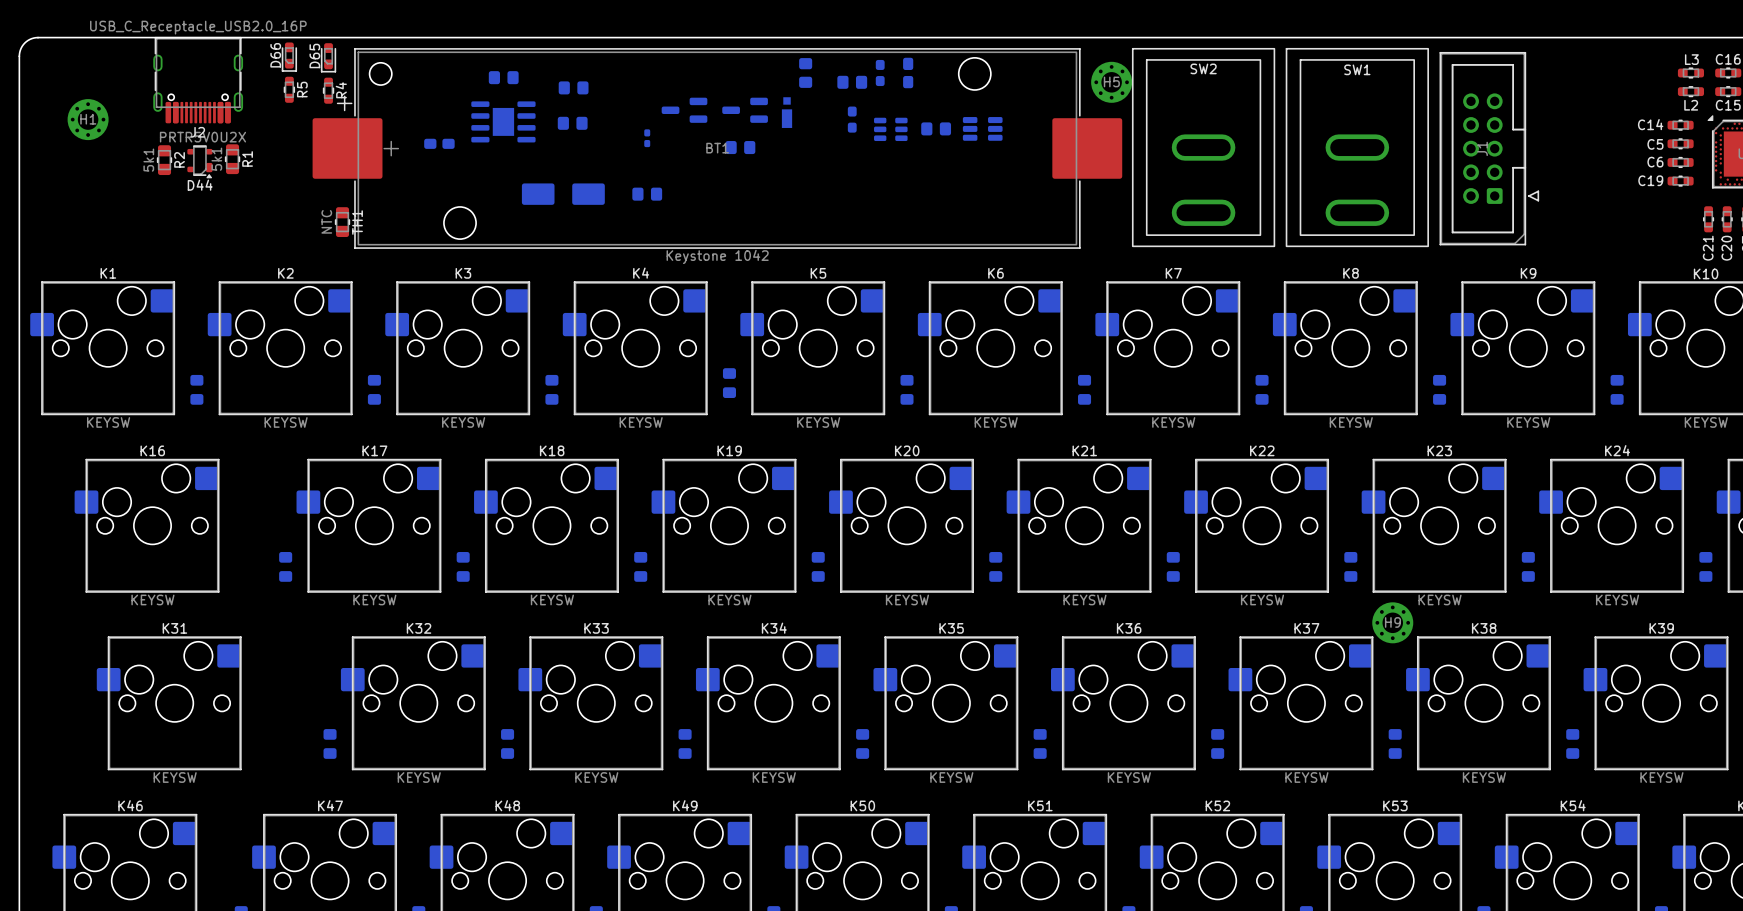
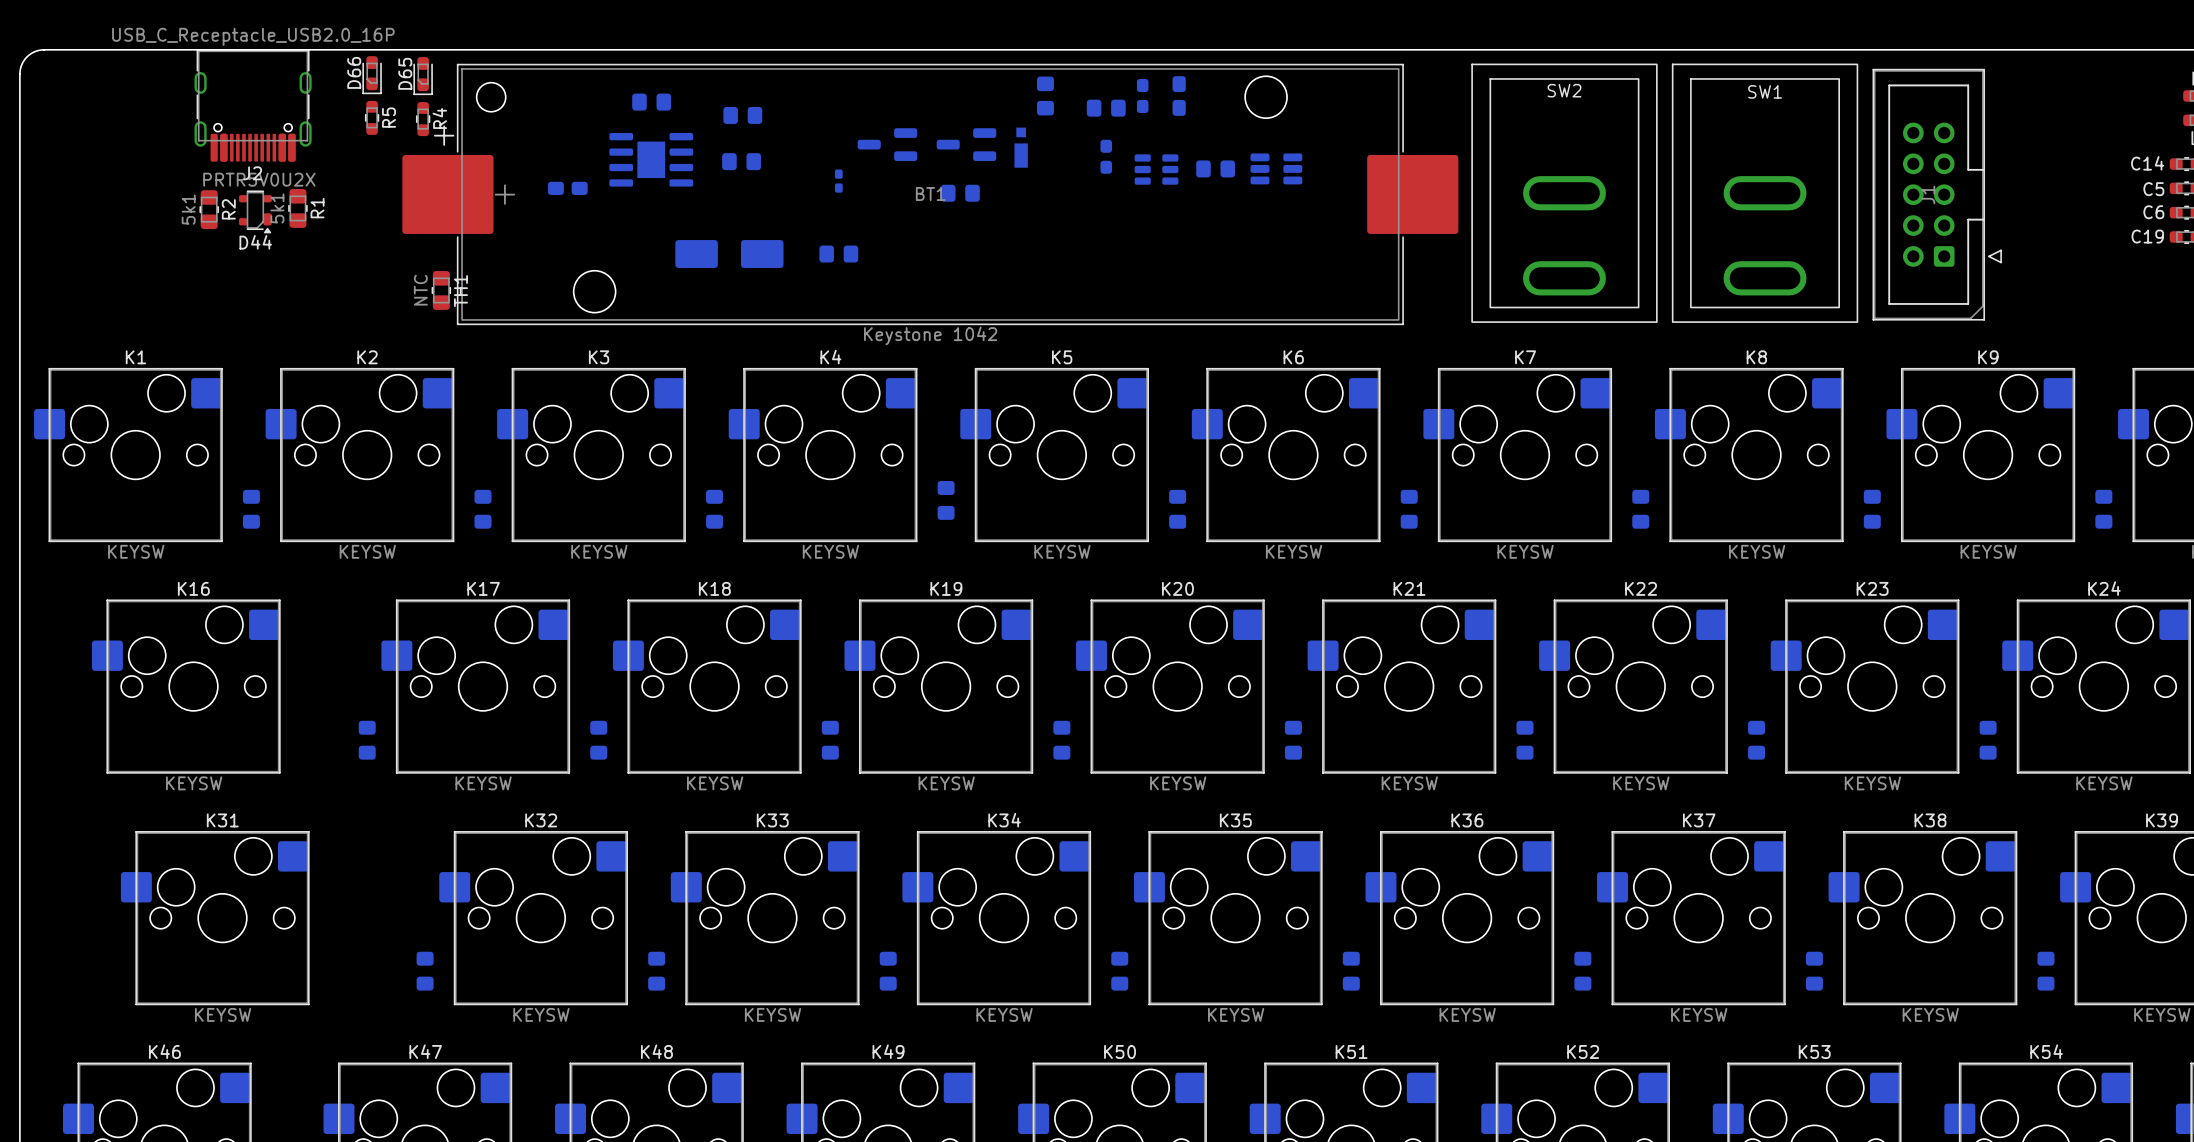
H5: (1111, 82) -> none
H1: (88, 119) -> none
H9: (1392, 622) -> none

